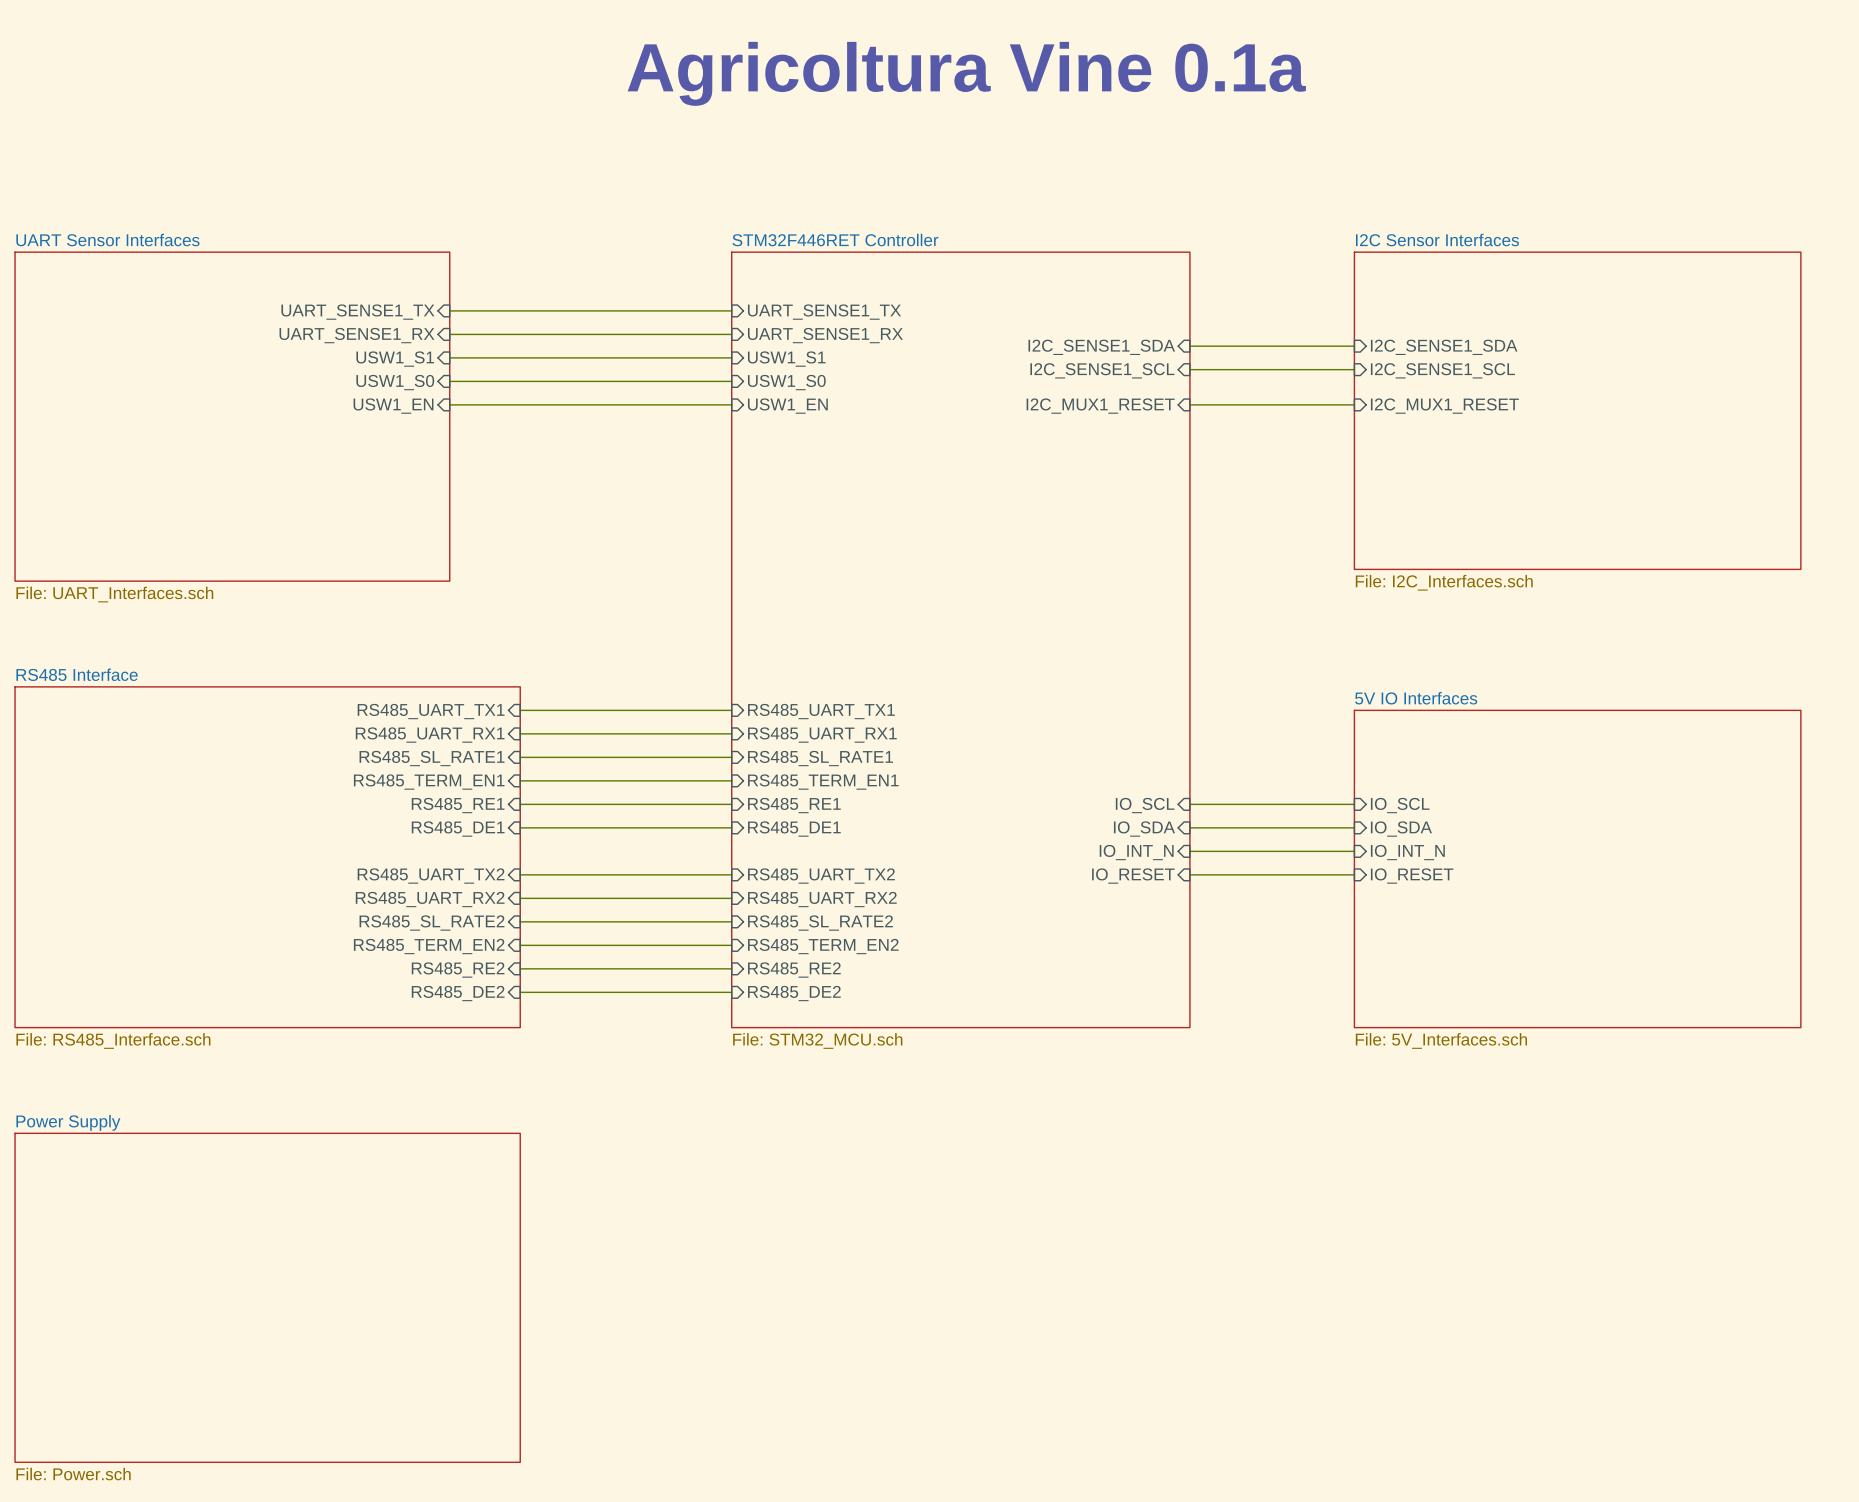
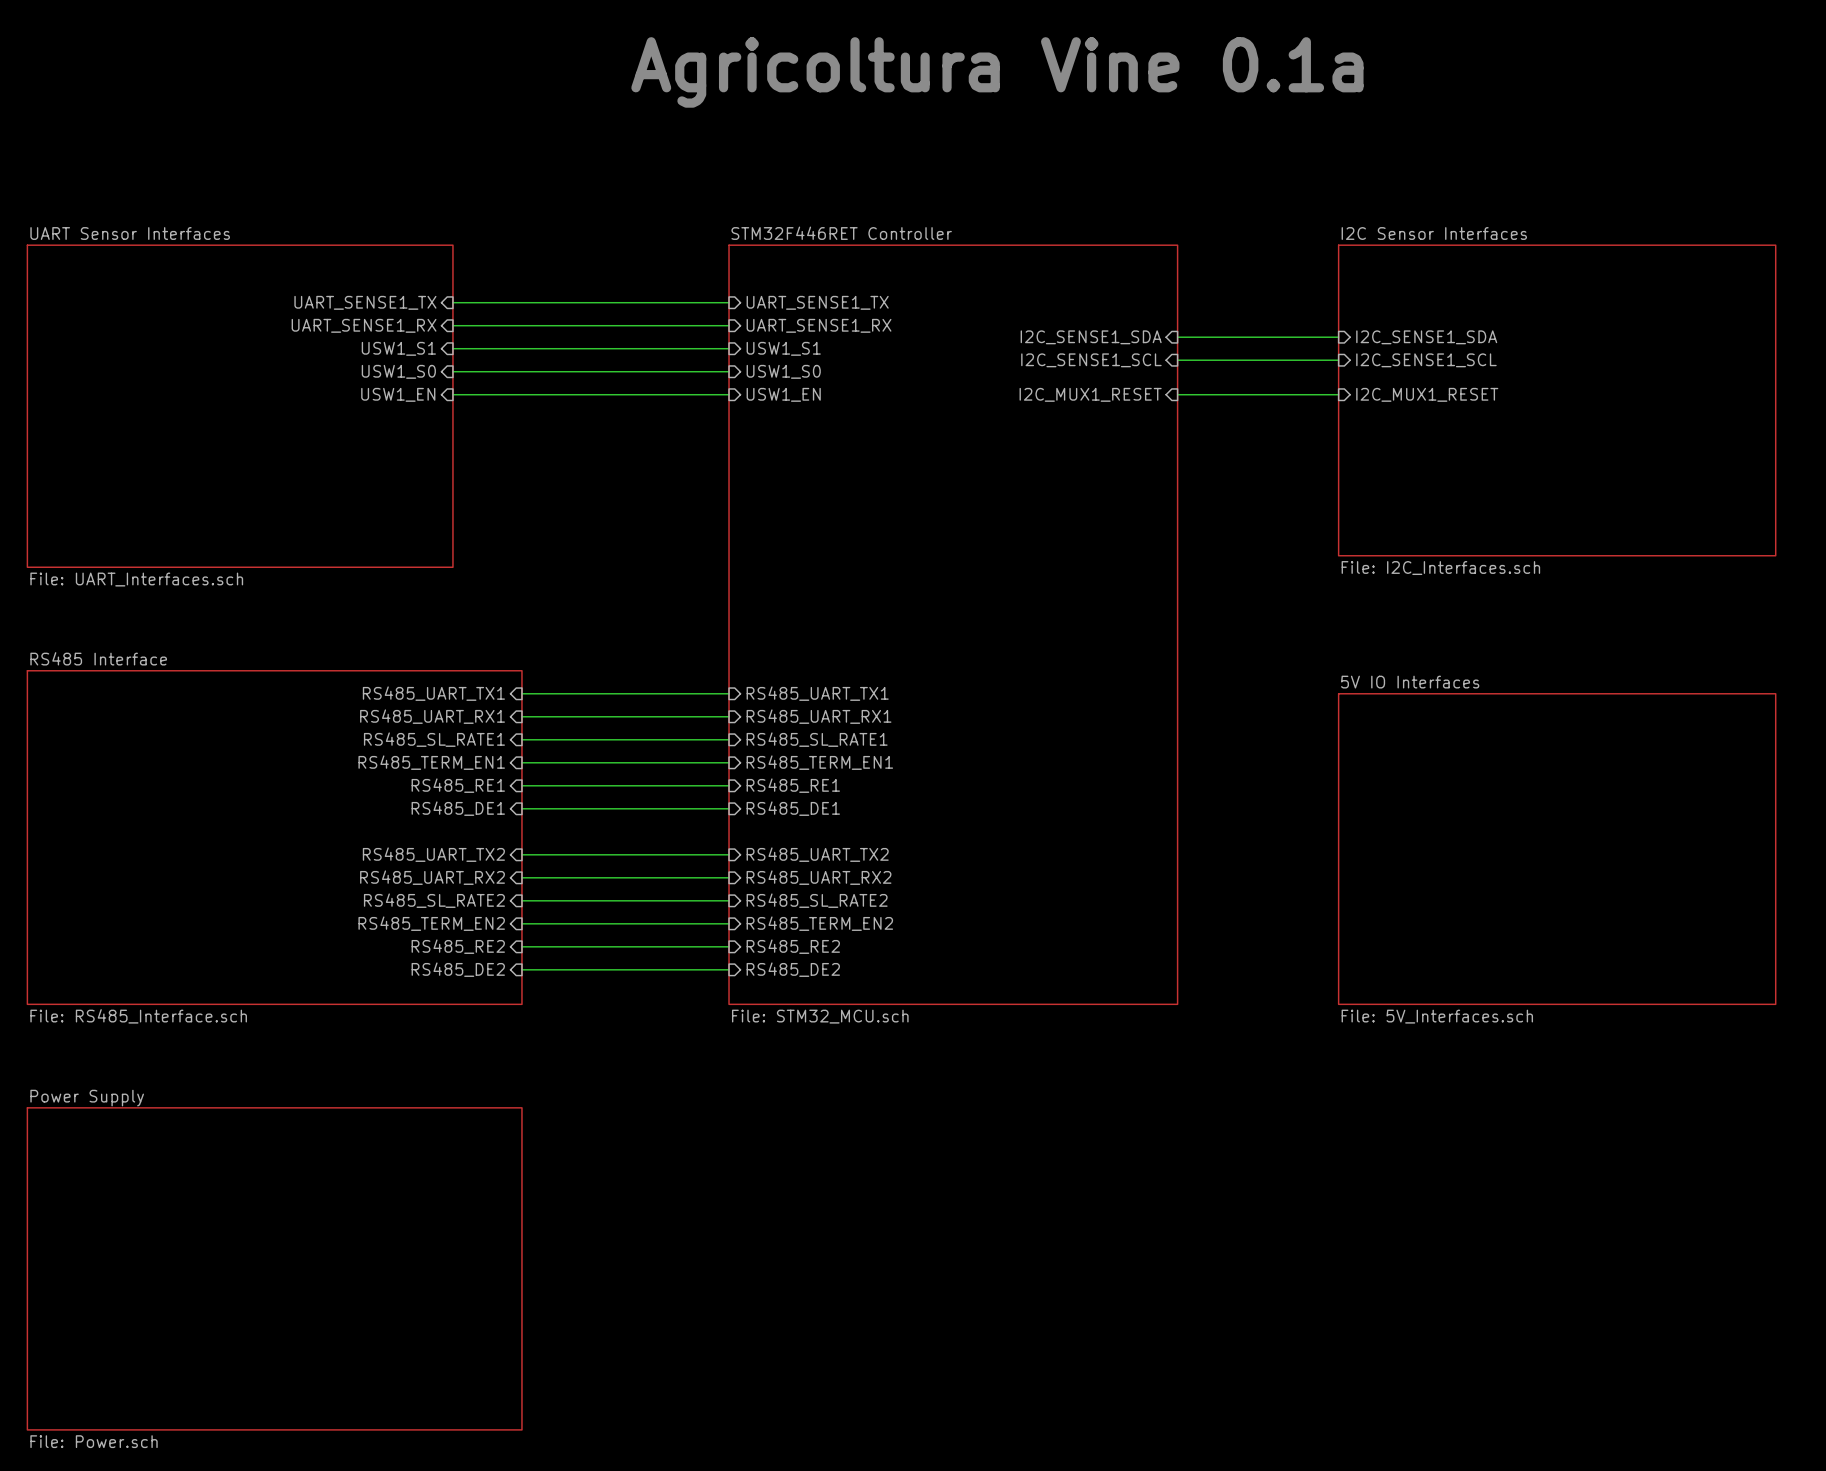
wire: (1189, 804) (1354, 804) -> none
sheet pin: IO_SCL (1145, 805) -> none
sheet pin: IO_SCL (1400, 805) -> none
wire: (1189, 827) (1354, 827) -> none
sheet pin: IO_SDA (1144, 829) -> none
sheet pin: IO_SDA (1401, 829) -> none
wire: (1189, 851) (1354, 851) -> none
sheet pin: IO_INT_N (1136, 852) -> none
sheet pin: IO_INT_N (1407, 852) -> none
wire: (1189, 874) (1354, 874) -> none
sheet pin: IO_RESET (1133, 876) -> none
sheet pin: IO_RESET (1412, 876) -> none

